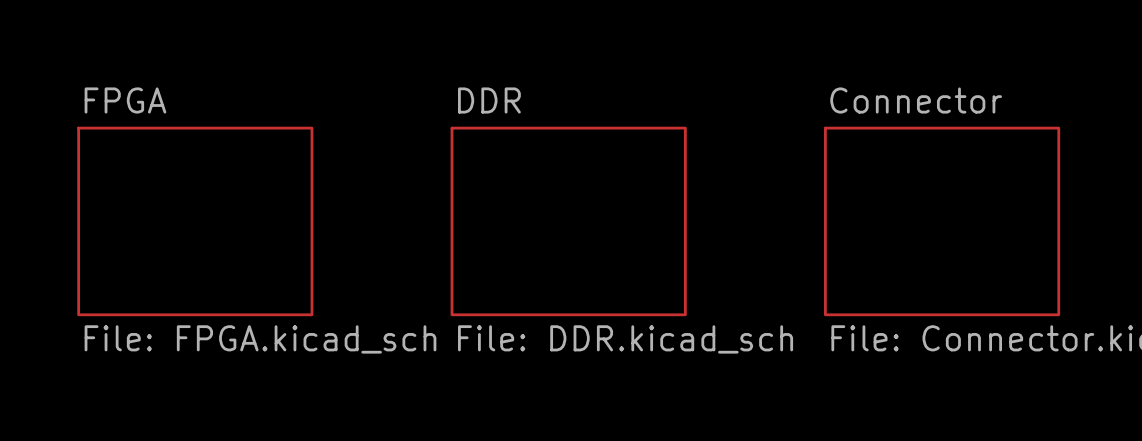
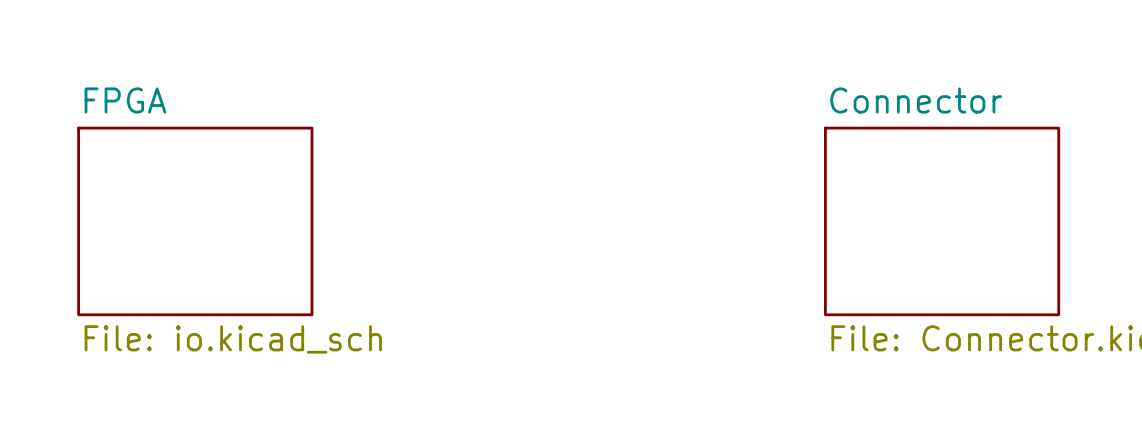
sheet DDR: File: DDR.kicad_sch (568, 221) -> none
sheet FPGA value: File: FPGA.kicad_sch (260, 339) -> File: io.kicad_sch (233, 339)

